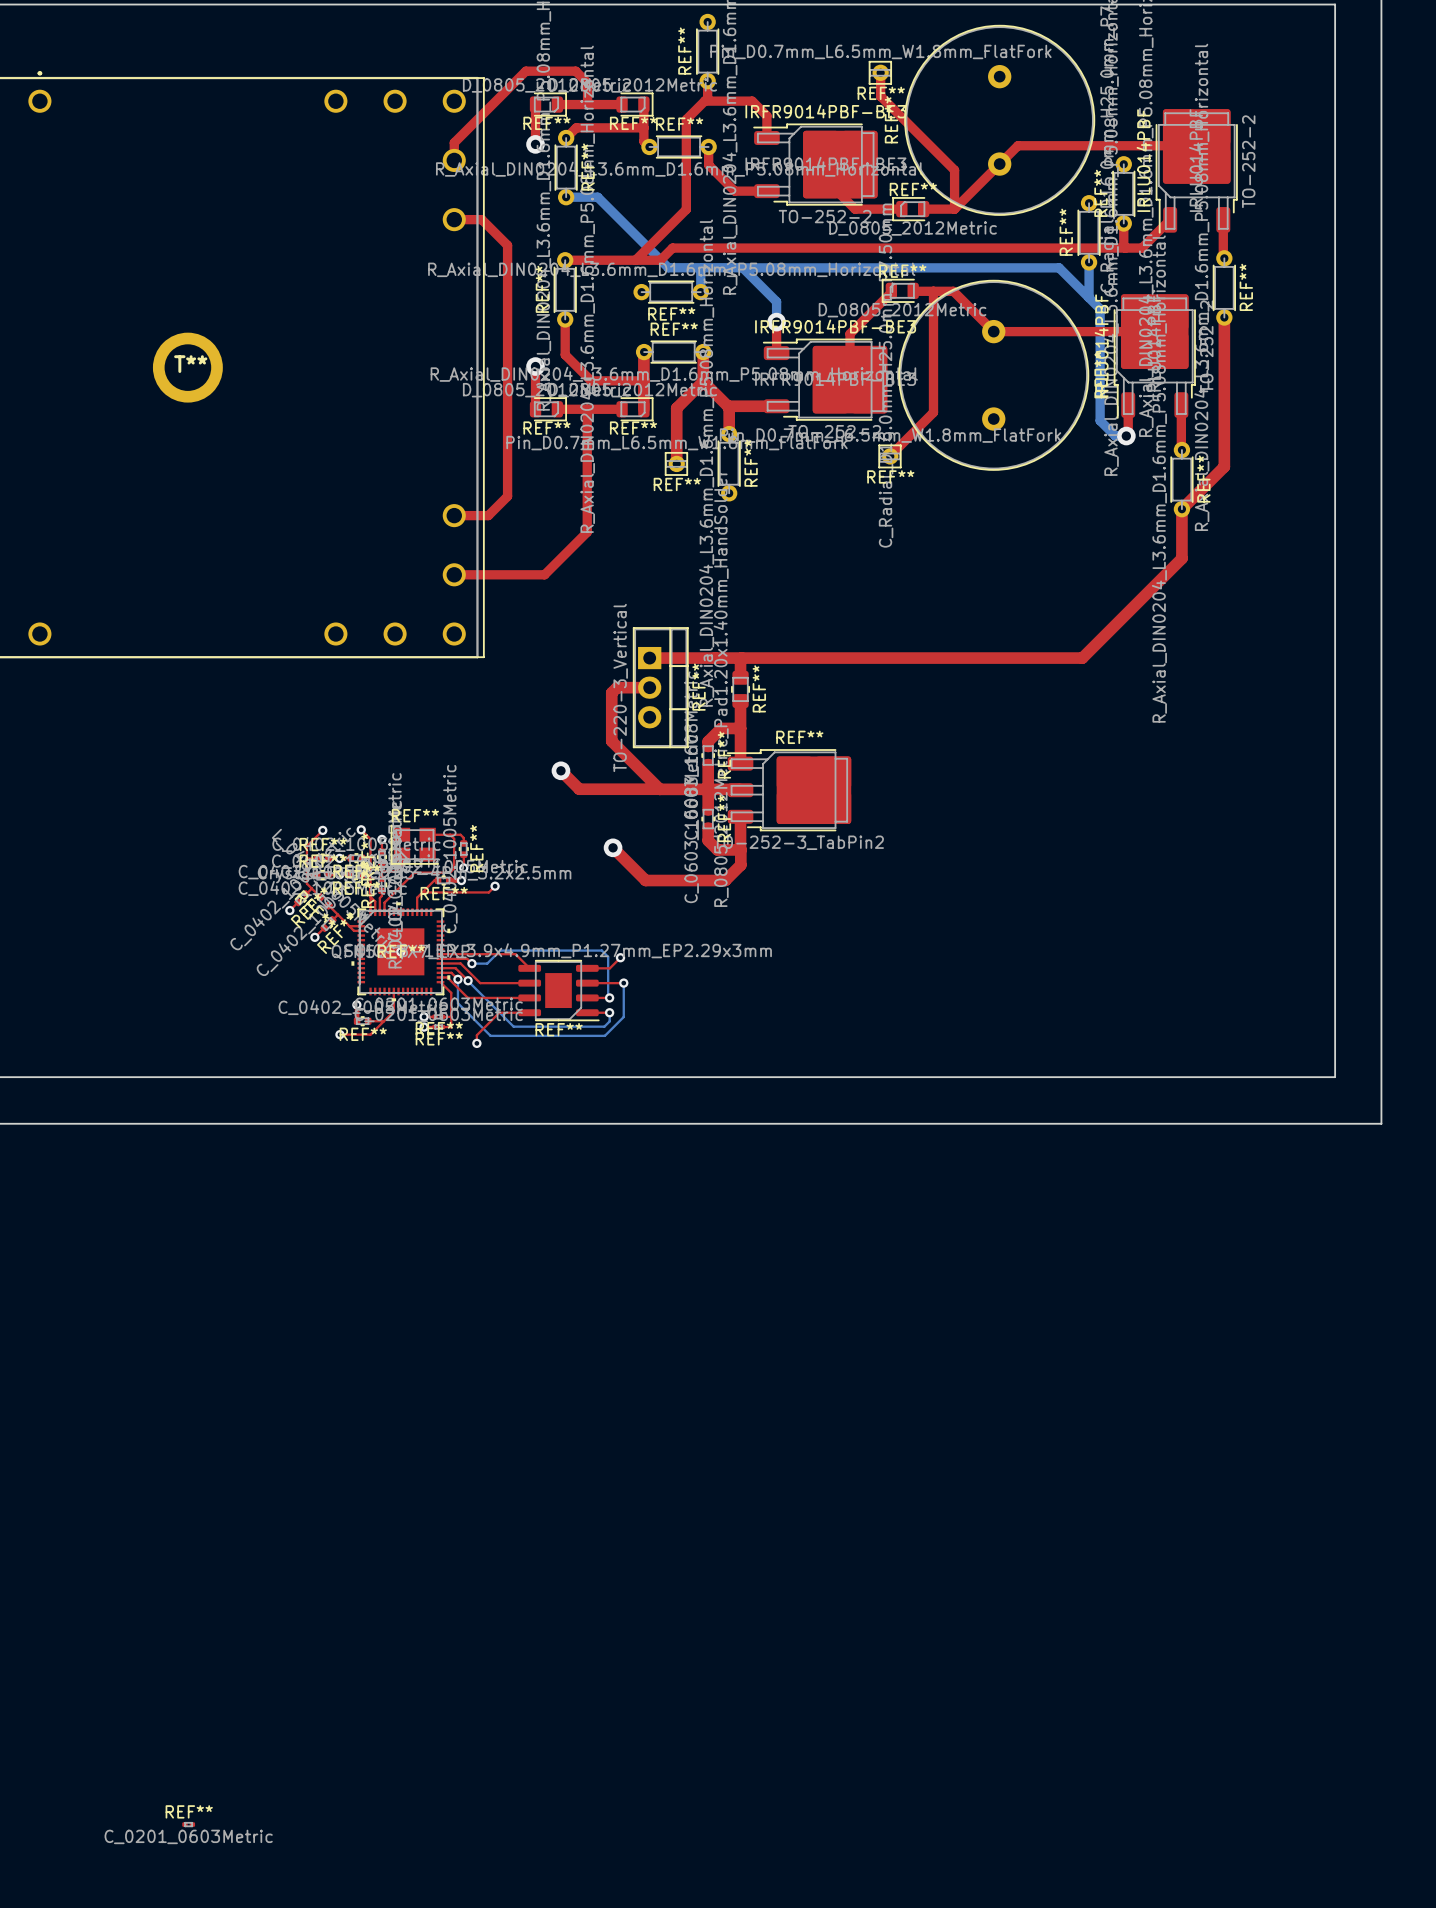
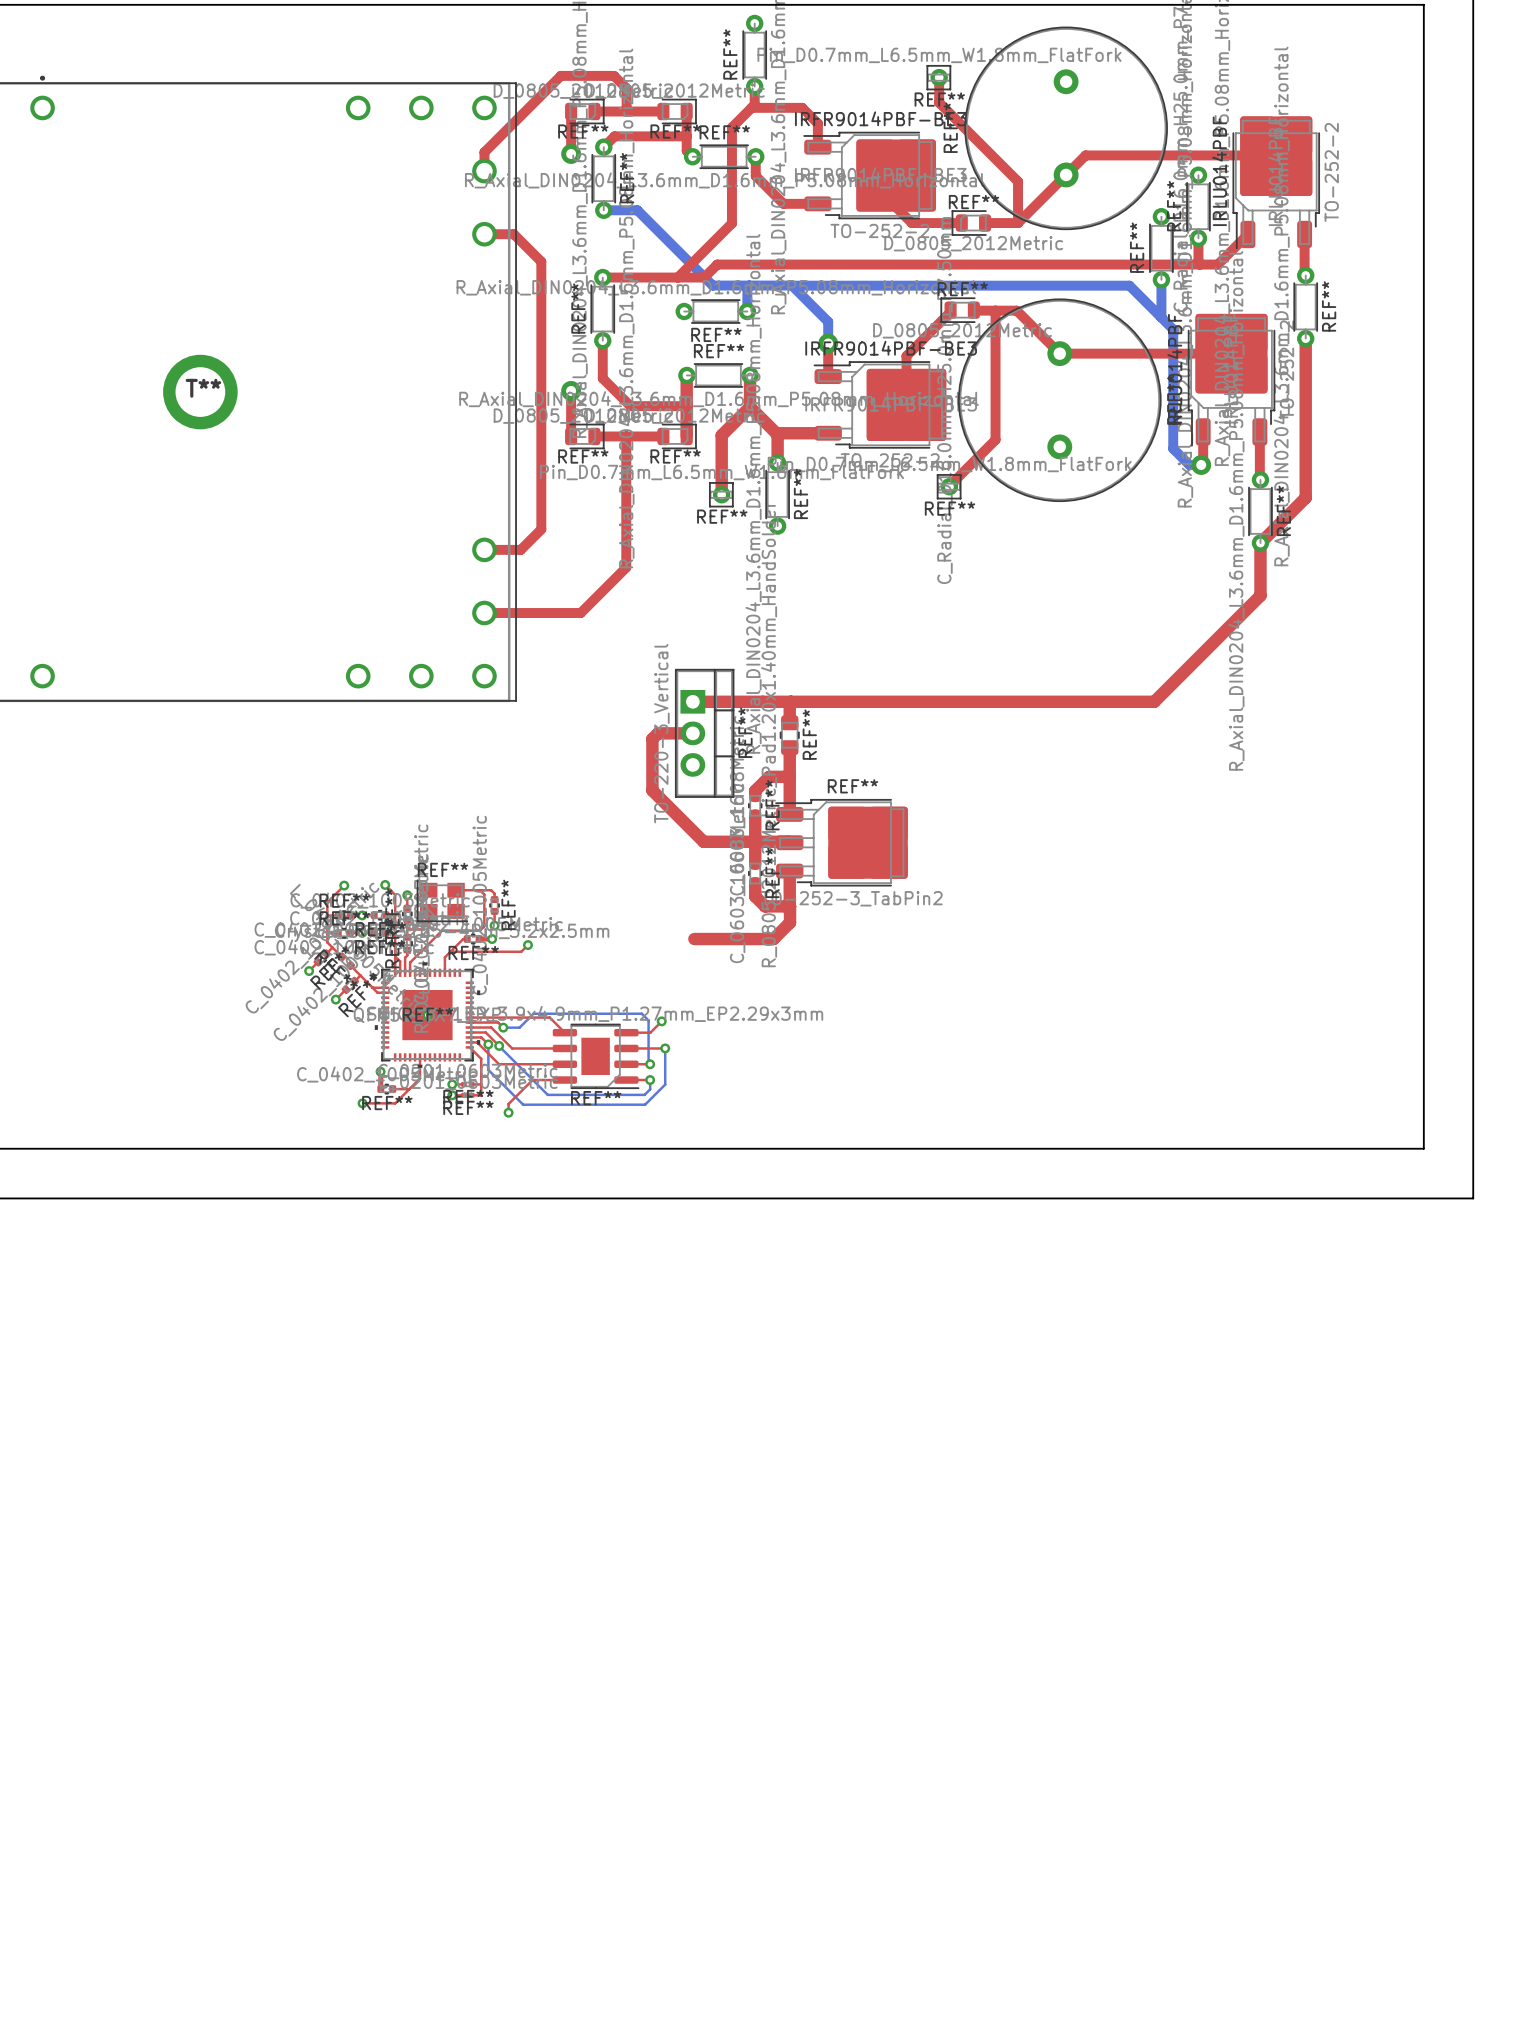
top track: (560, 770) (579, 789) (659, 789) -> none
via: (560, 770) -> none
top track: (613, 847) (645, 880) (651, 880) -> none
via: (613, 847) -> none
REF**: C_0201_0603Metric (188, 1824) -> none

